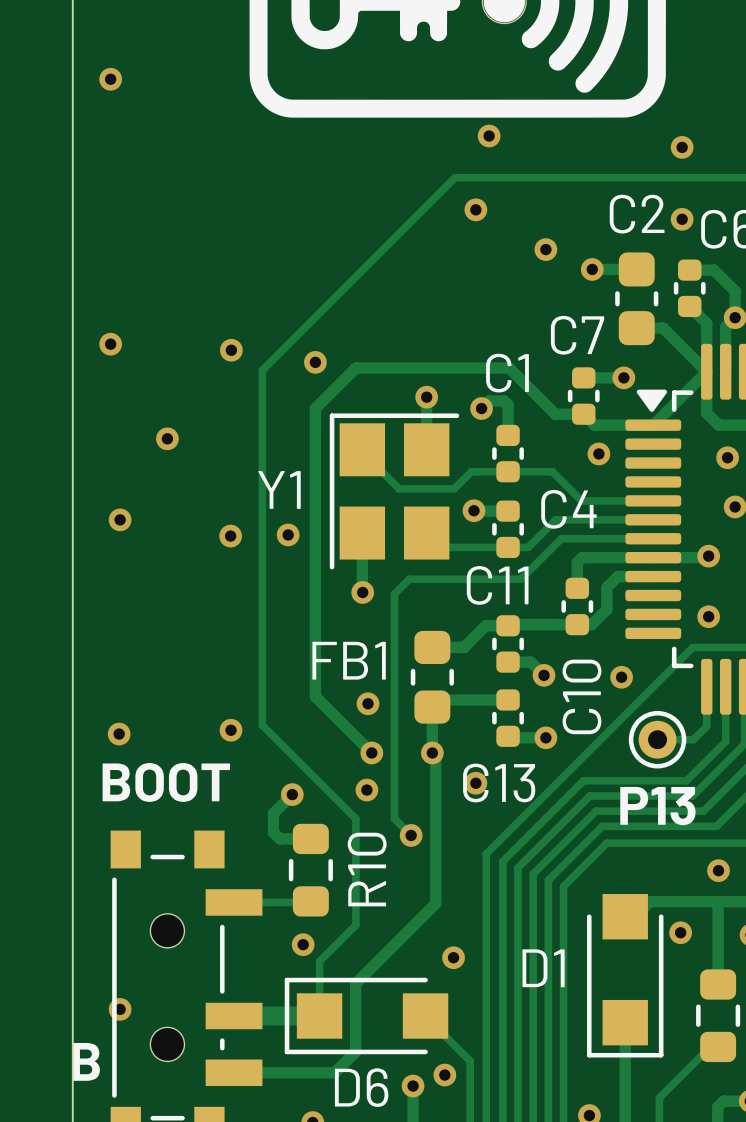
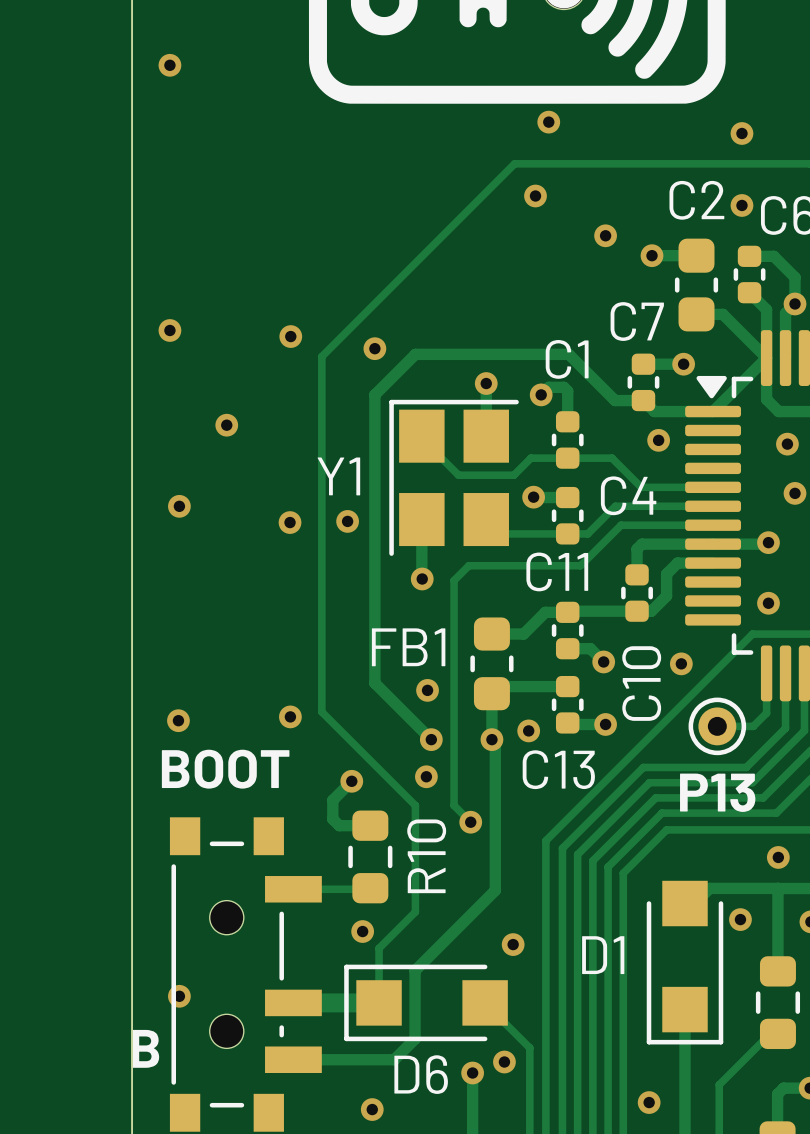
via position: (475, 783) -> (528, 730)

